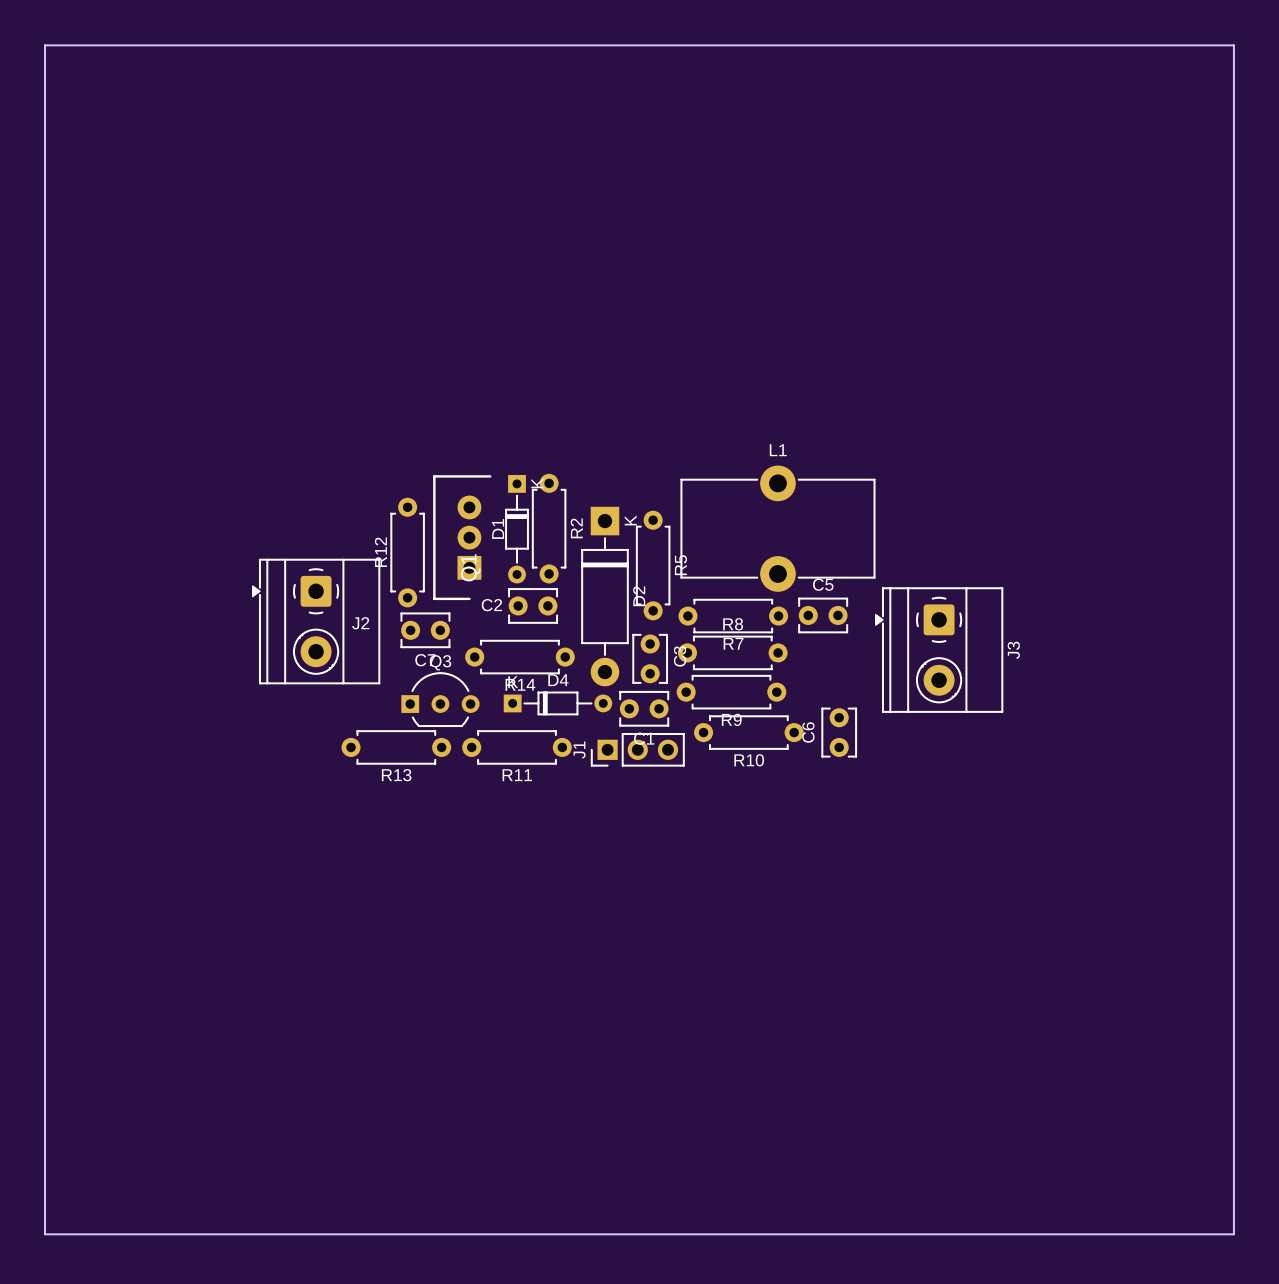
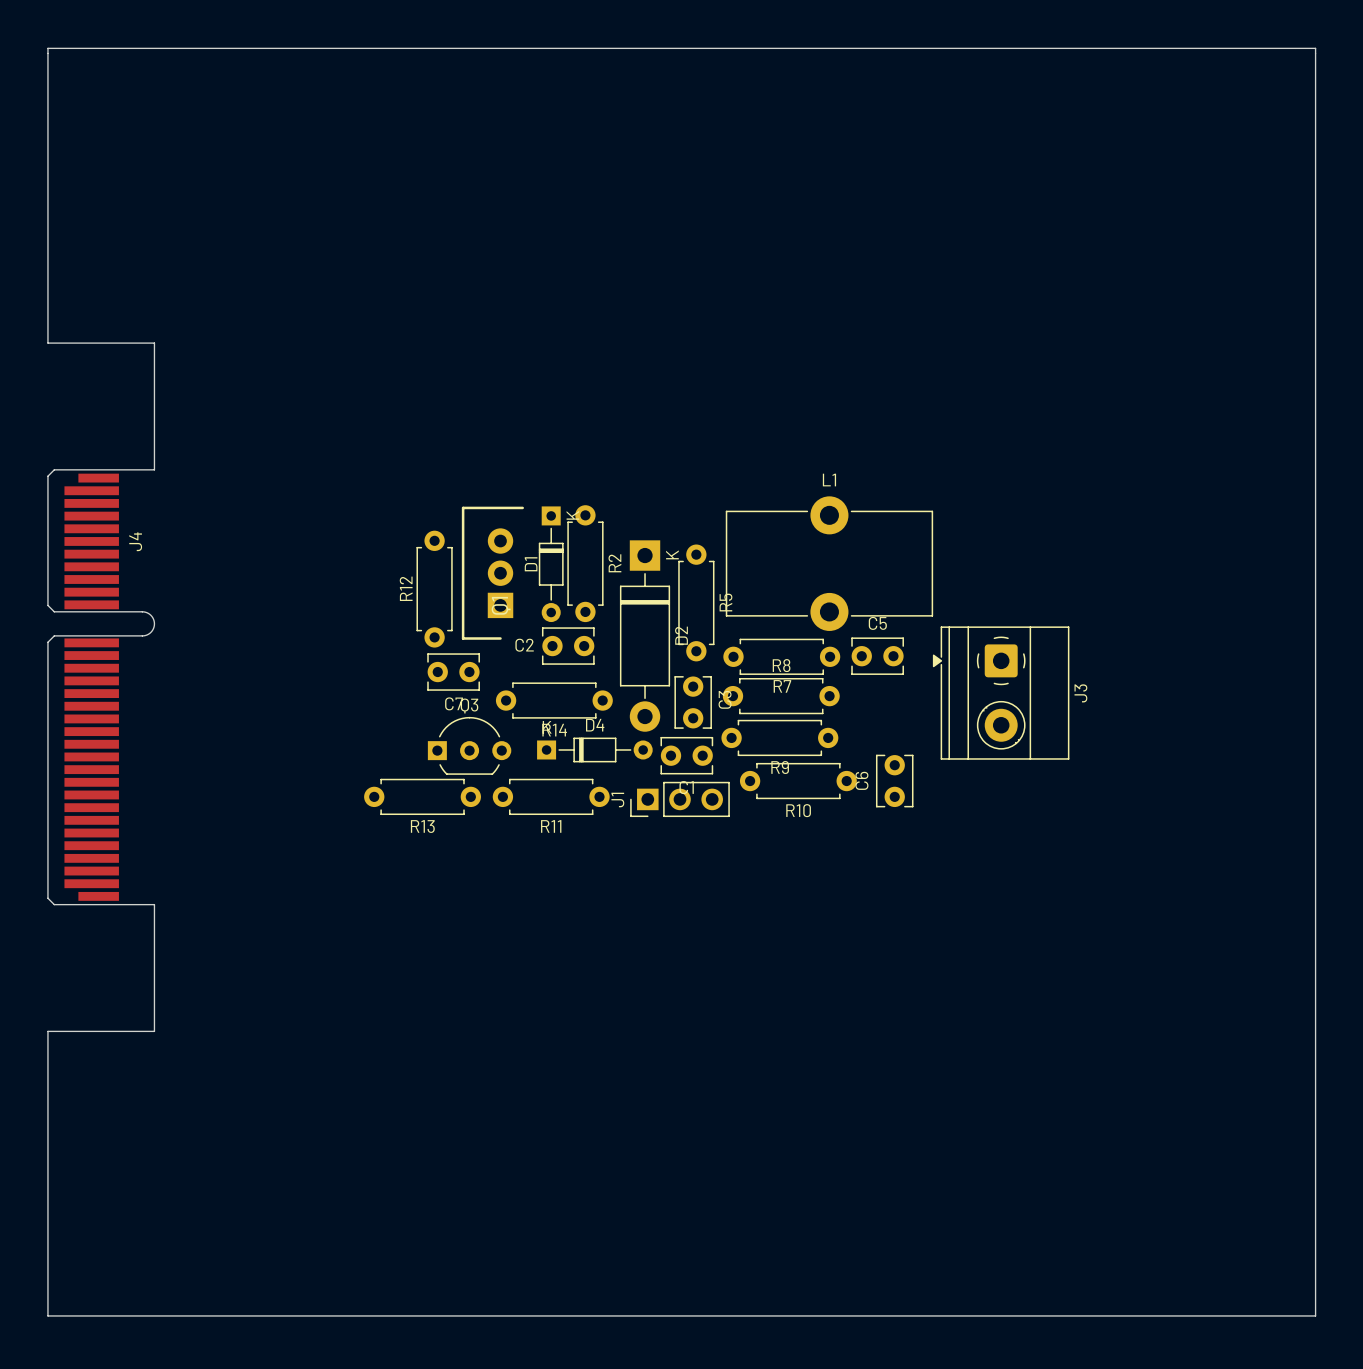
board edge: (44, 321) (44, 967) -> (154, 904) (154, 1031) (47, 1031)
board edge: none -> (47, 343) (154, 343) (154, 469)
J2: (316, 621) -> none
J4: none -> (101, 687)

